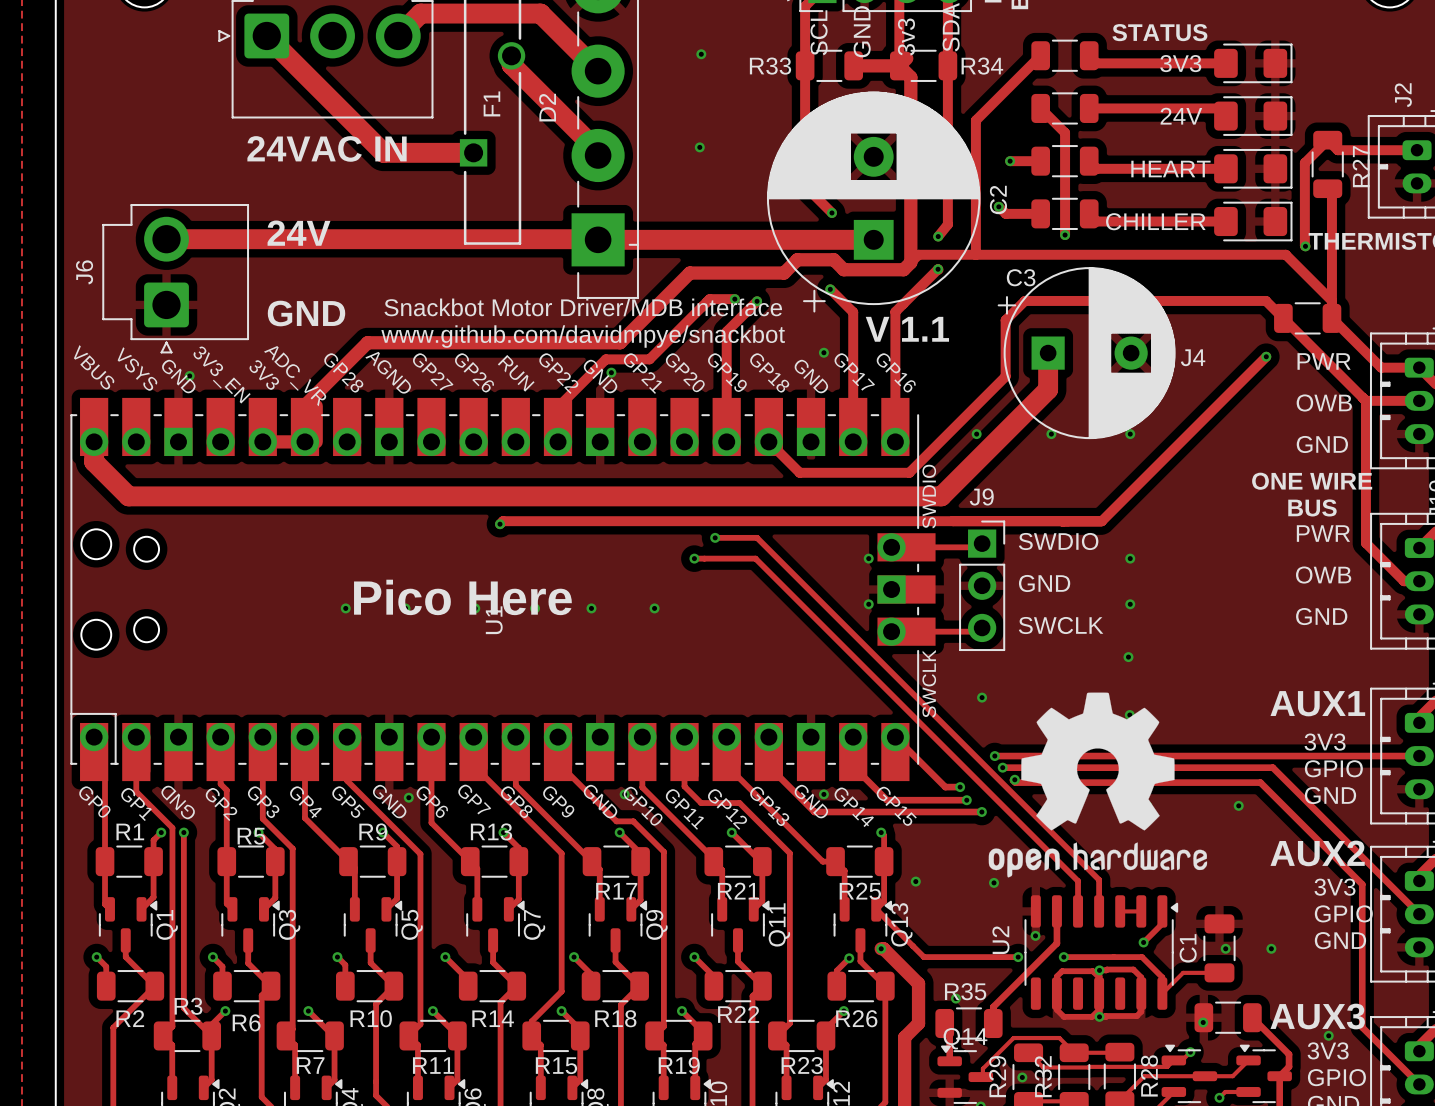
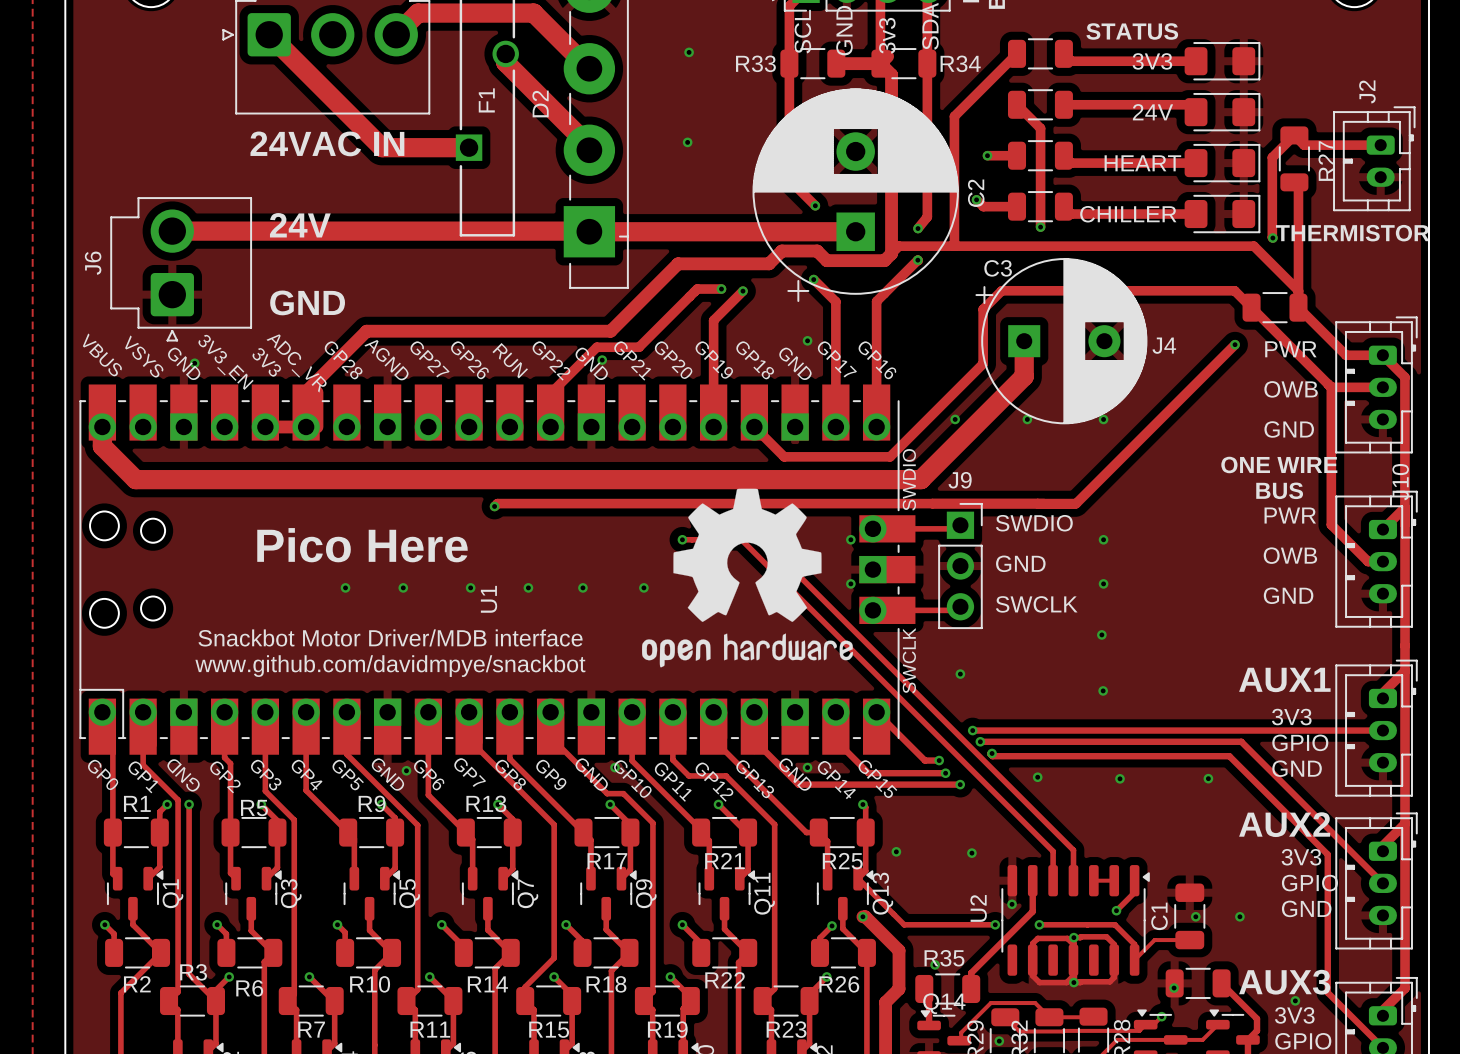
text position: Snackbot Motor Driver/MDB interface (583, 307) -> Snackbot Motor Driver/MDB interface (390, 637)
text: V 1.1 (907, 329) -> none
text position: www.github.com/davidmpye/snackbot (583, 336) -> www.github.com/davidmpye/snackbot (390, 666)
text position: Pico Here (462, 597) -> Pico Here (362, 545)
drawing position: (1097, 784) -> (747, 578)

